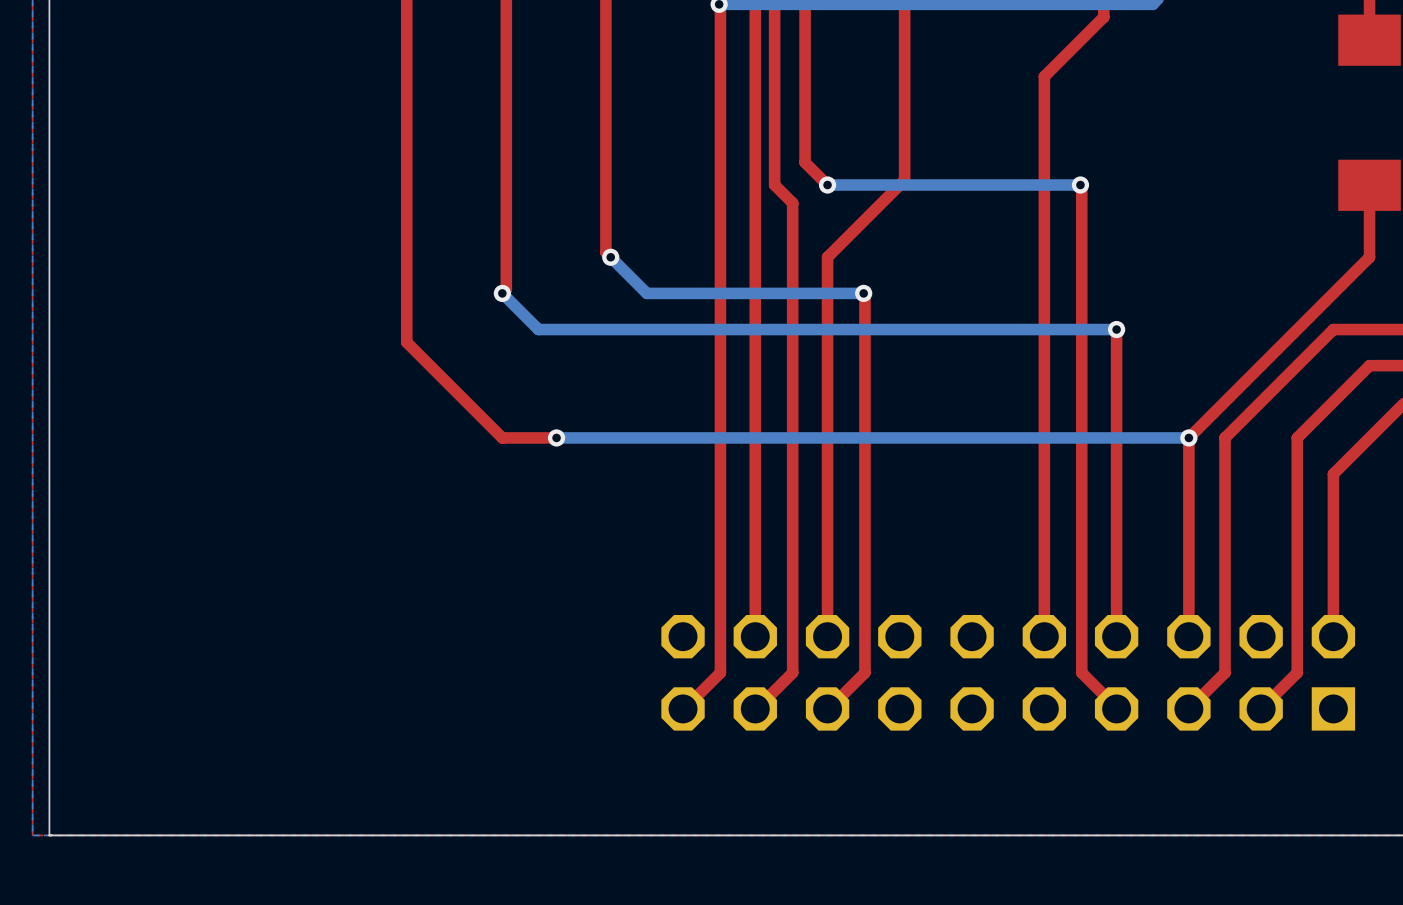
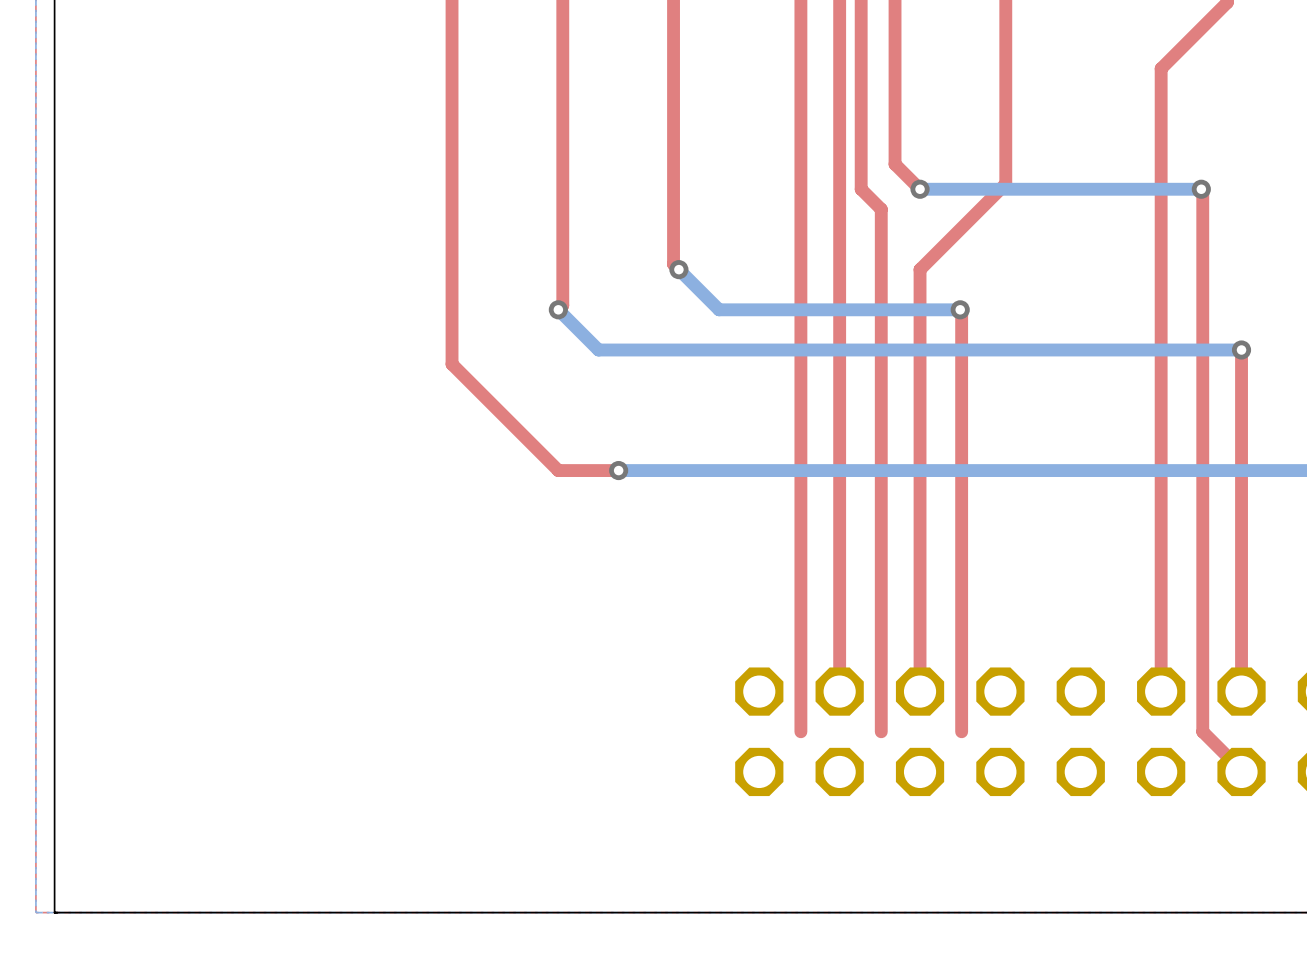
top track: (720, 672) (683, 708) -> none
top track: (792, 672) (755, 708) -> none
top track: (864, 672) (827, 708) -> none

